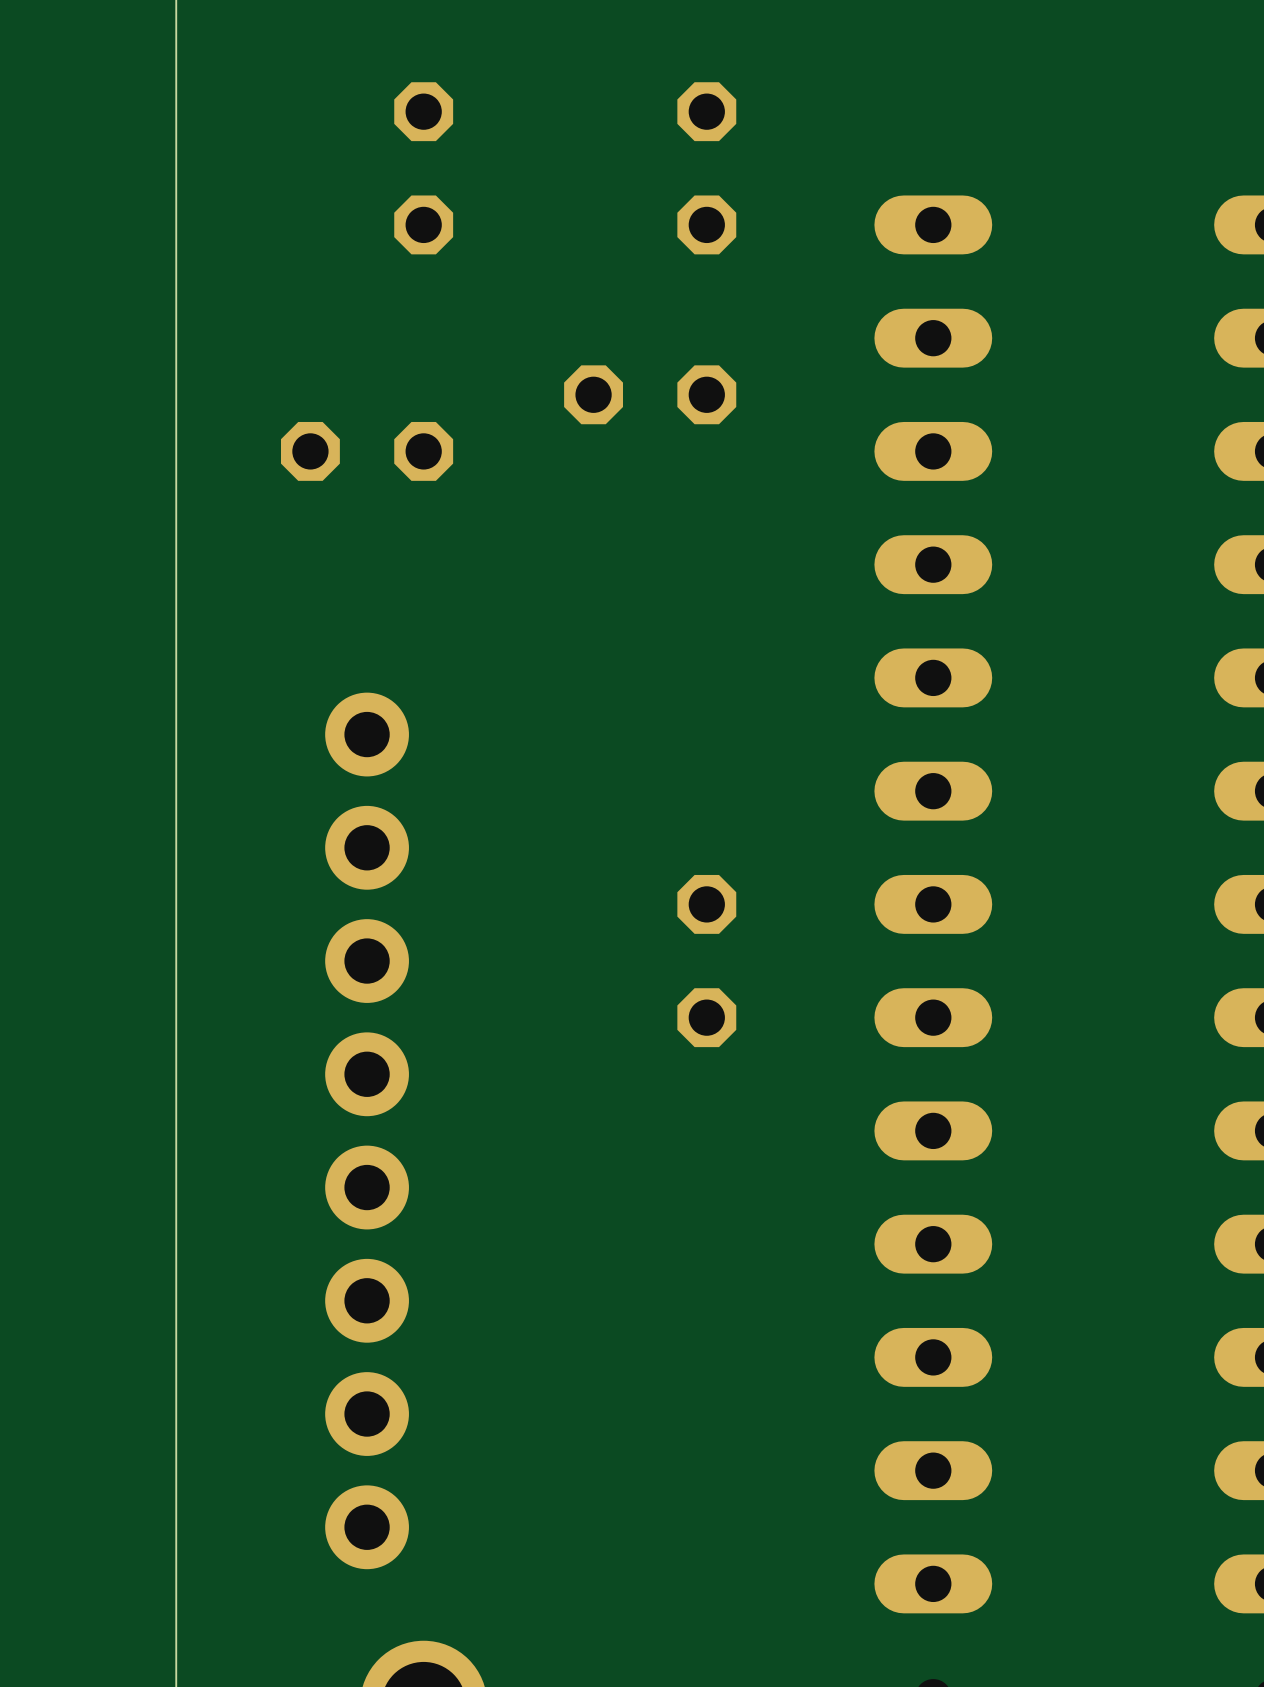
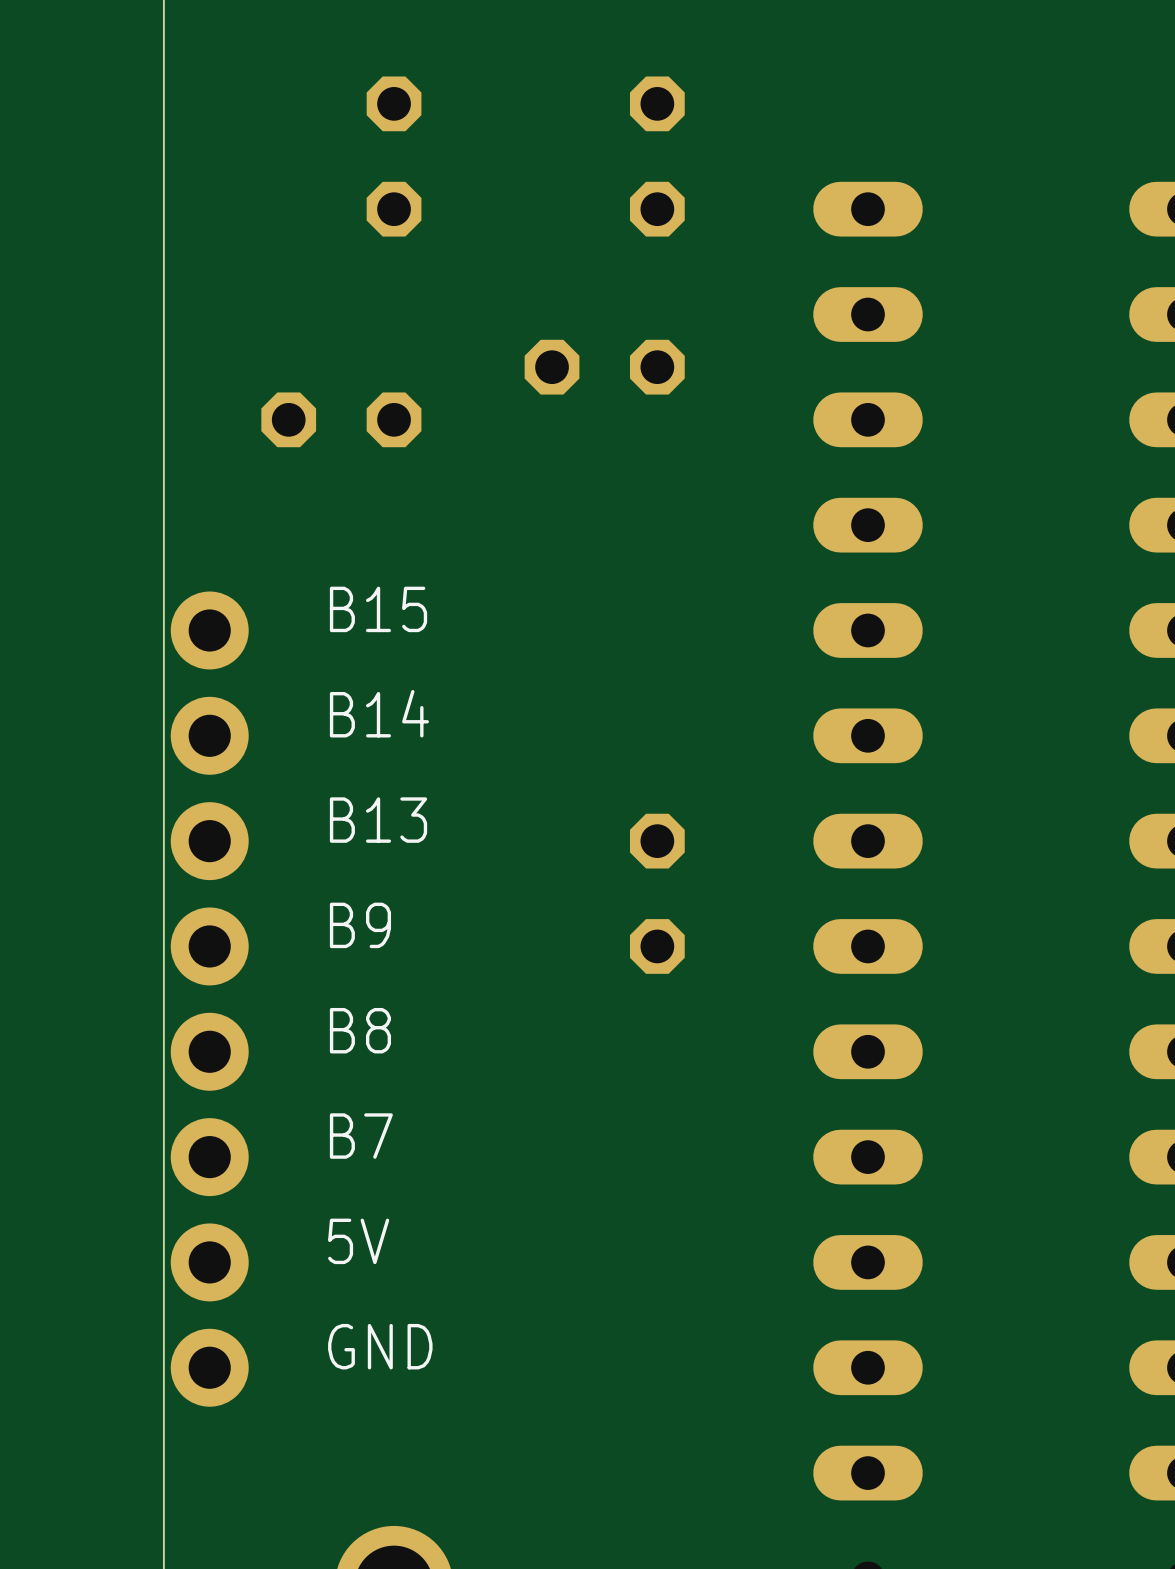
text: none -> B15 (378, 609)
text: none -> B14 (379, 713)
text: none -> B13 (378, 820)
text: none -> B9 (360, 925)
text: none -> B8 (360, 1030)
part position: (367, 1130) -> (209, 999)
text: none -> B7 (361, 1136)
text: none -> 5V (358, 1241)
text: none -> GND (380, 1346)

